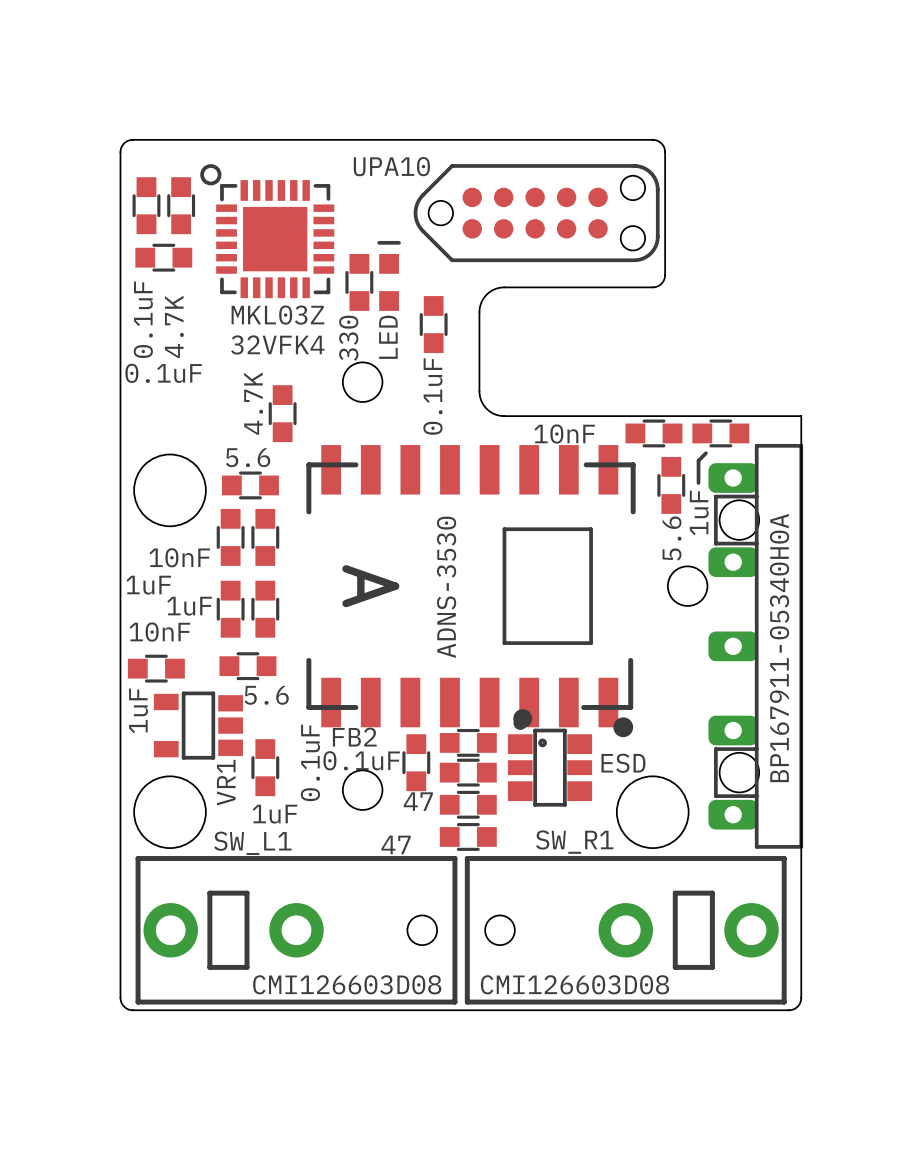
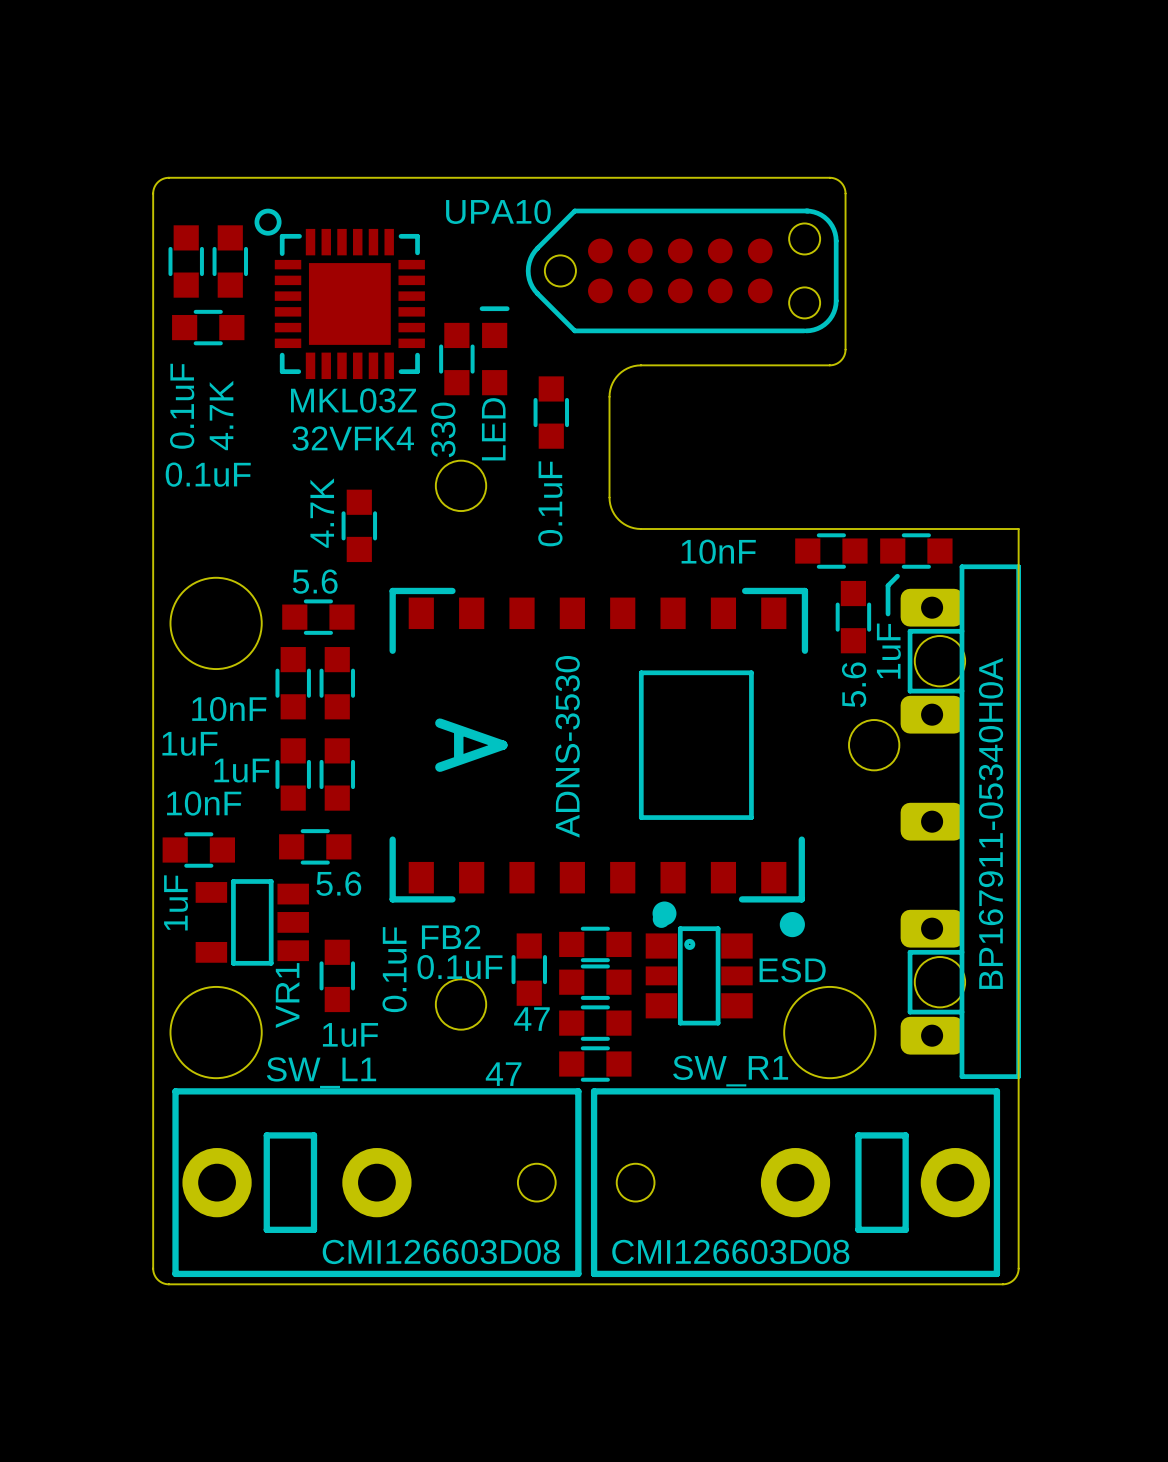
part footprint: [306, 445, 636, 738] -> [389, 587, 809, 938]

